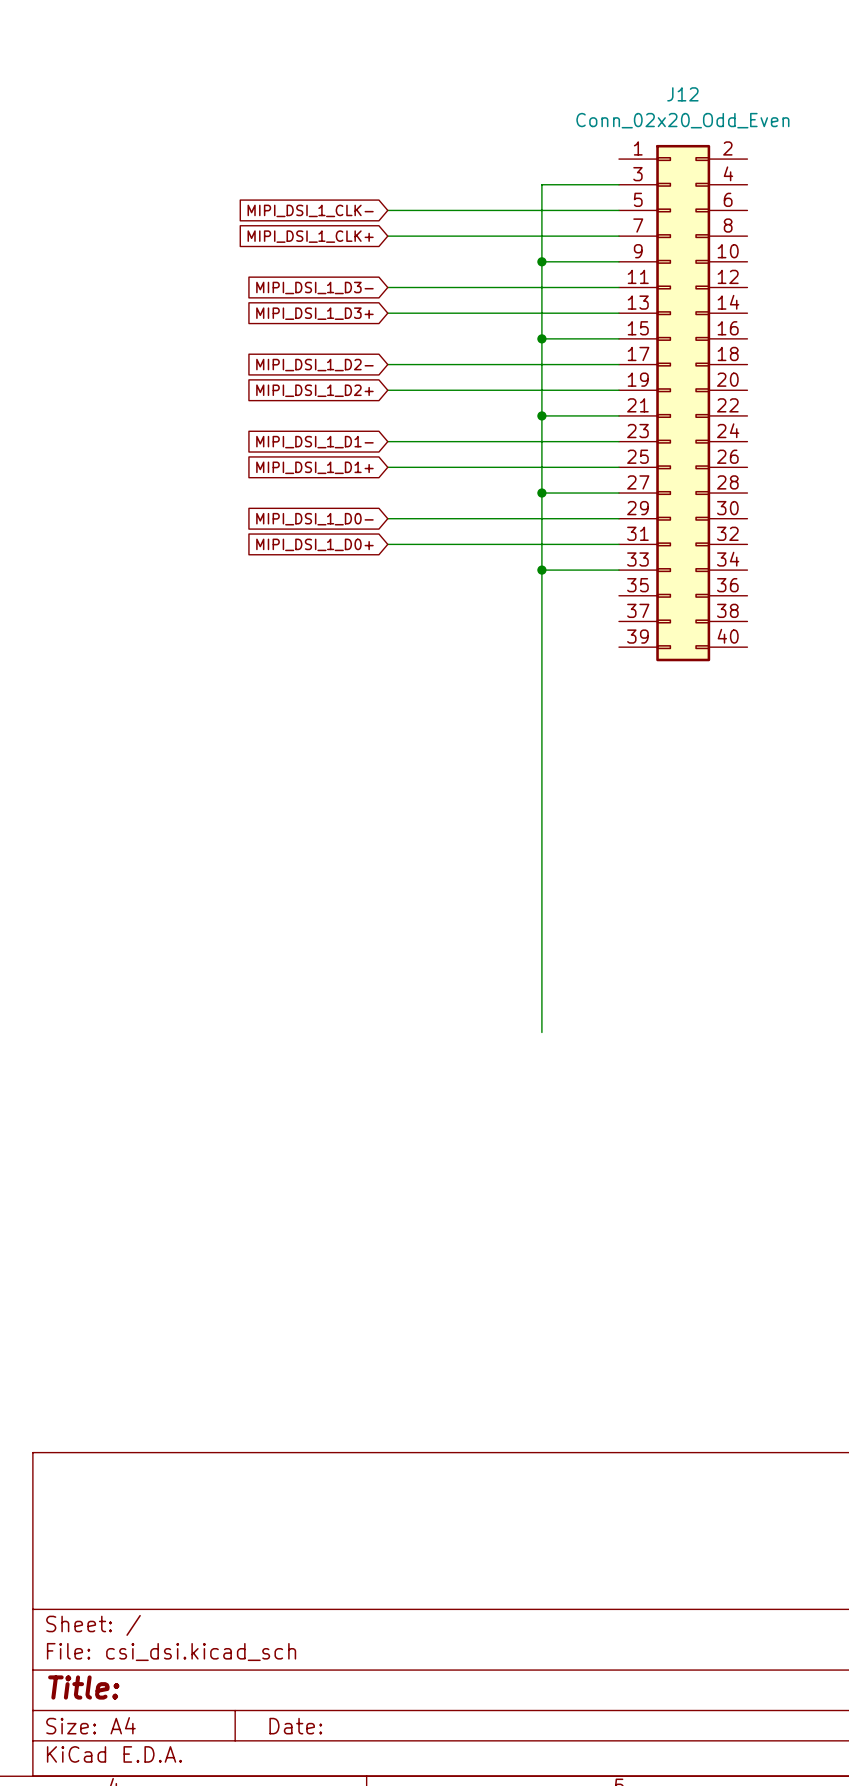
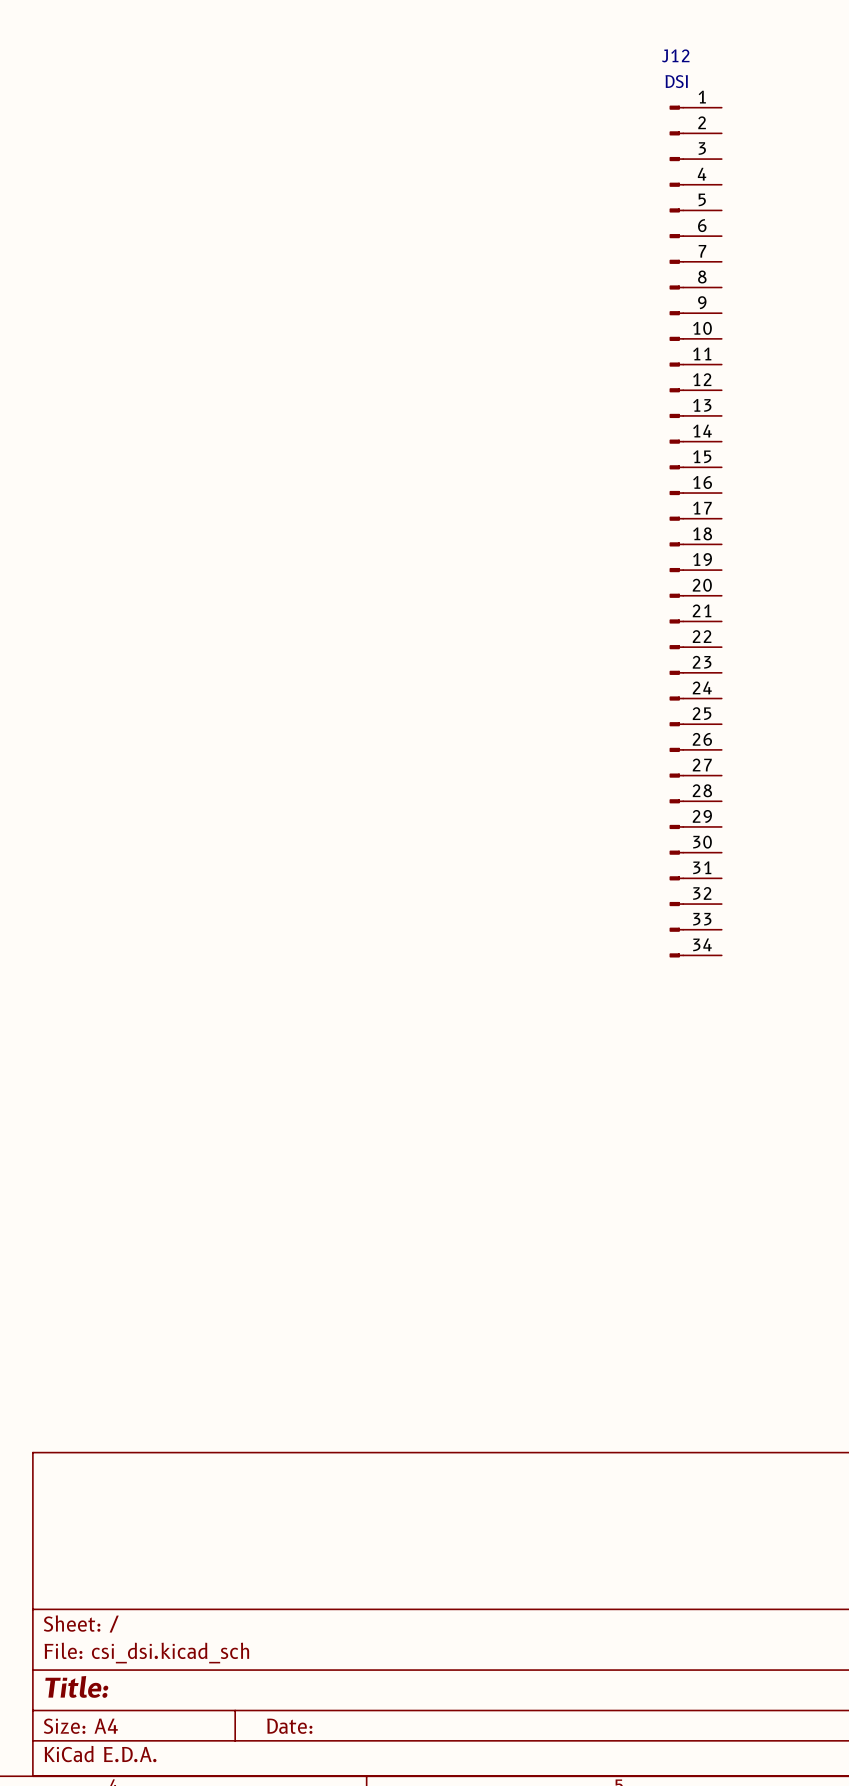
J12 name position: J12 (682, 94) -> J12 (675, 55)
J12 value: Conn_02x20_Odd_Even (682, 120) -> DSI (676, 81)
J12 symbol: [618, 144, 748, 662] -> [669, 105, 722, 958]
wire: (618, 184) (541, 184) (541, 1032) -> none
global label: MIPI_DSI_1_CLK- (310, 210) -> none
wire: (387, 210) (618, 210) -> none
global label: MIPI_DSI_1_CLK+ (310, 236) -> none
wire: (387, 236) (618, 236) -> none
wire: (541, 261) (618, 261) -> none
junction: (541, 261) -> none
global label: MIPI_DSI_1_D3- (314, 287) -> none
wire: (387, 287) (618, 287) -> none
global label: MIPI_DSI_1_D3+ (314, 313) -> none
wire: (387, 313) (618, 313) -> none
wire: (541, 338) (618, 338) -> none
junction: (541, 338) -> none
wire: (387, 364) (618, 364) -> none
global label: MIPI_DSI_1_D2- (314, 365) -> none
global label: MIPI_DSI_1_D2+ (314, 390) -> none
wire: (387, 390) (618, 390) -> none
wire: (541, 415) (618, 415) -> none
junction: (541, 415) -> none
wire: (387, 441) (618, 441) -> none
global label: MIPI_DSI_1_D1- (314, 442) -> none
global label: MIPI_DSI_1_D1+ (314, 467) -> none
wire: (387, 467) (618, 467) -> none
wire: (541, 493) (618, 493) -> none
junction: (541, 493) -> none
wire: (387, 518) (618, 518) -> none
global label: MIPI_DSI_1_D0- (314, 519) -> none
global label: MIPI_DSI_1_D0+ (314, 544) -> none
wire: (387, 544) (618, 544) -> none
wire: (541, 570) (618, 570) -> none
junction: (541, 570) -> none

